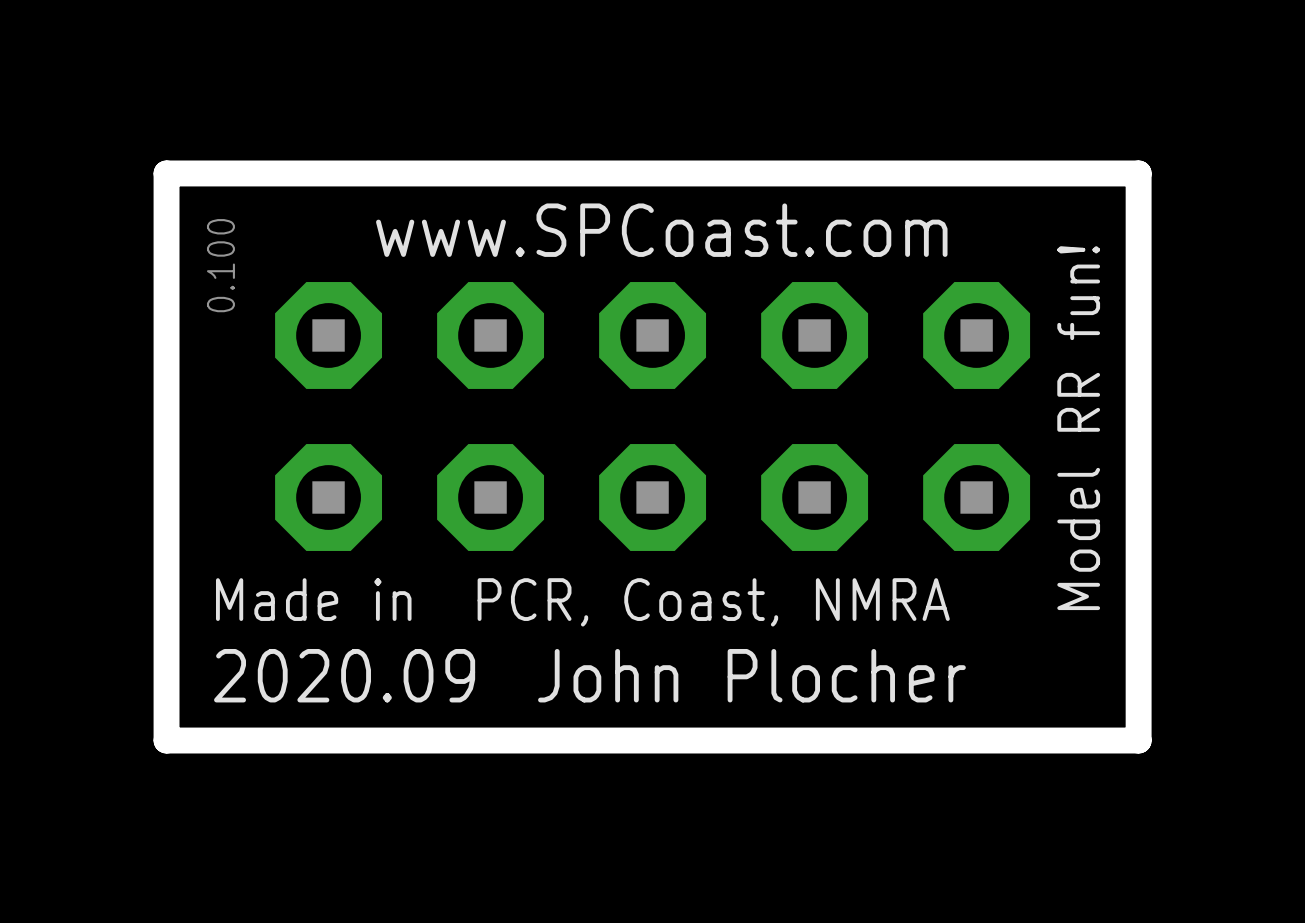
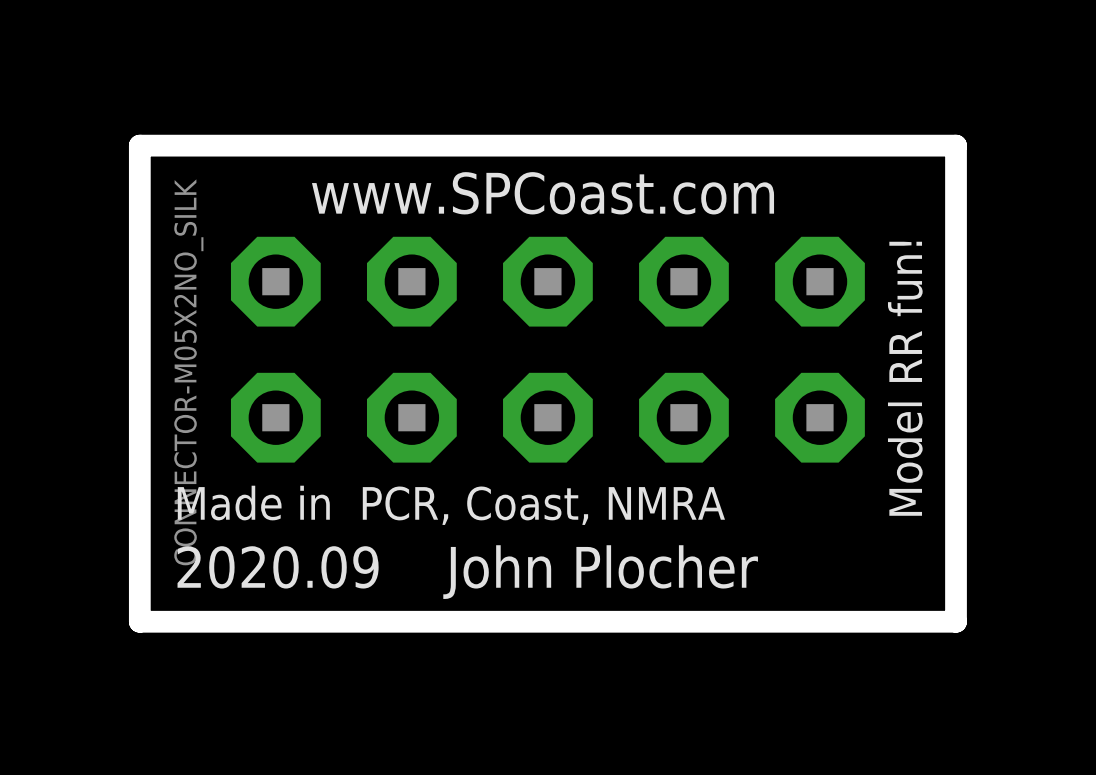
part value: 0.100 (220, 265) -> CONNECTOR-M05X2NO_SILK (188, 372)

